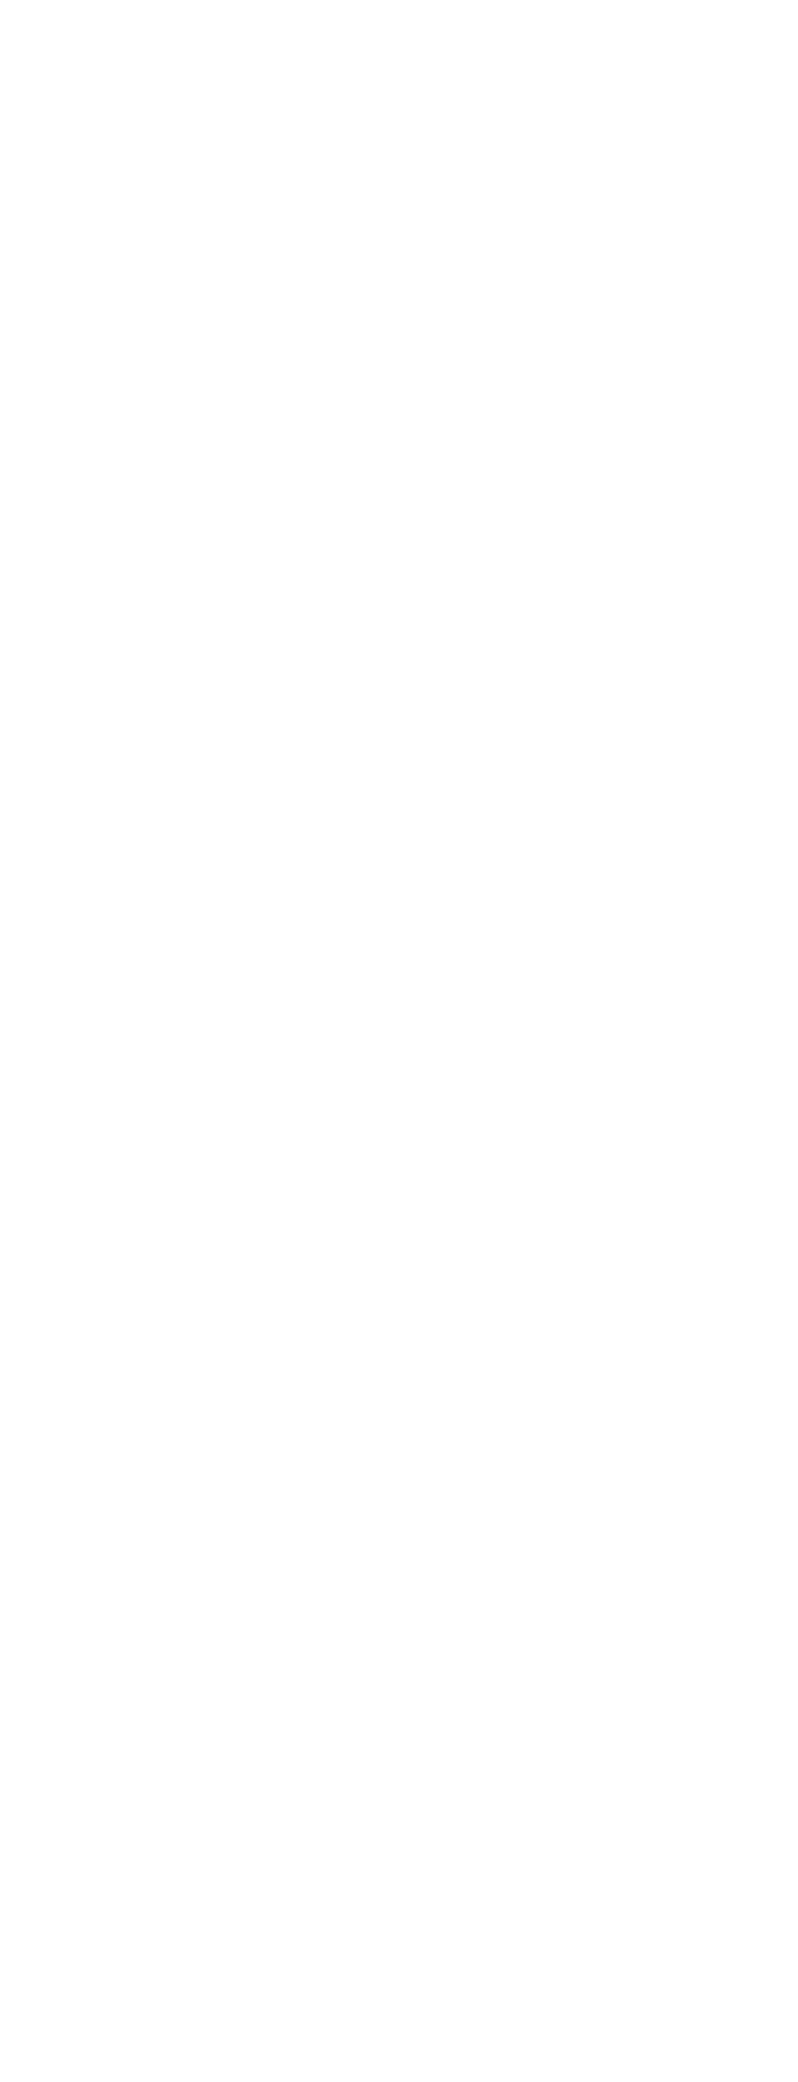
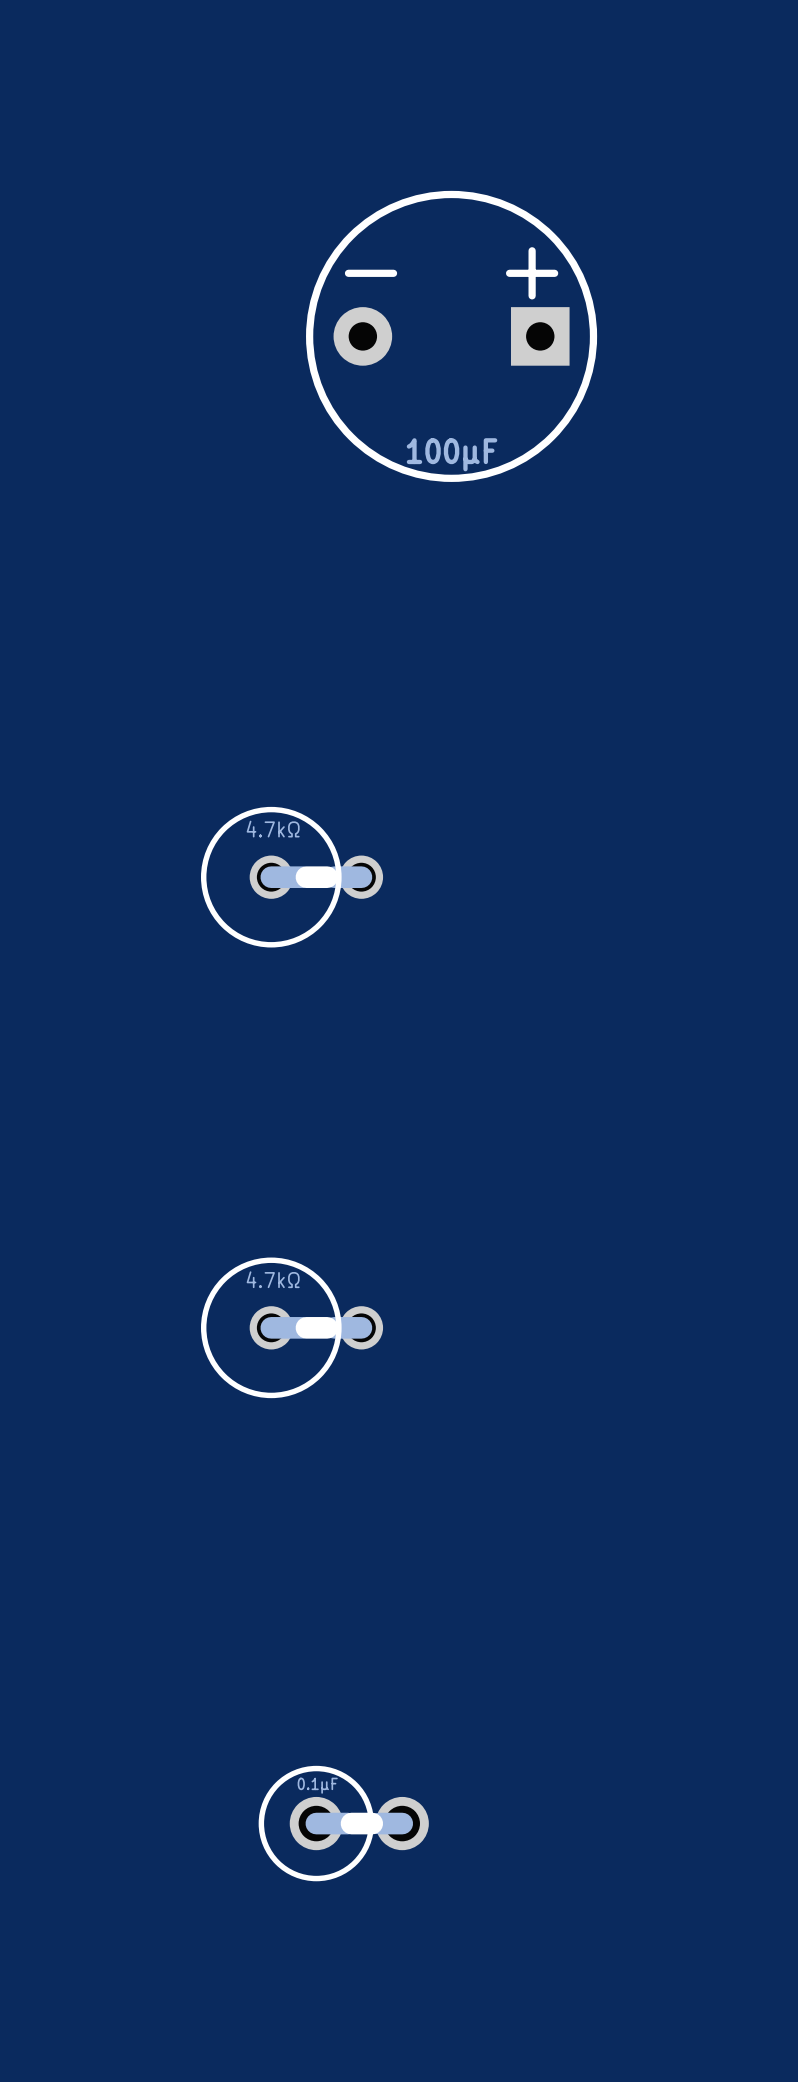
part: none -> (451, 336)
part: none -> (292, 877)
part: none -> (292, 1327)
part: none -> (343, 1823)

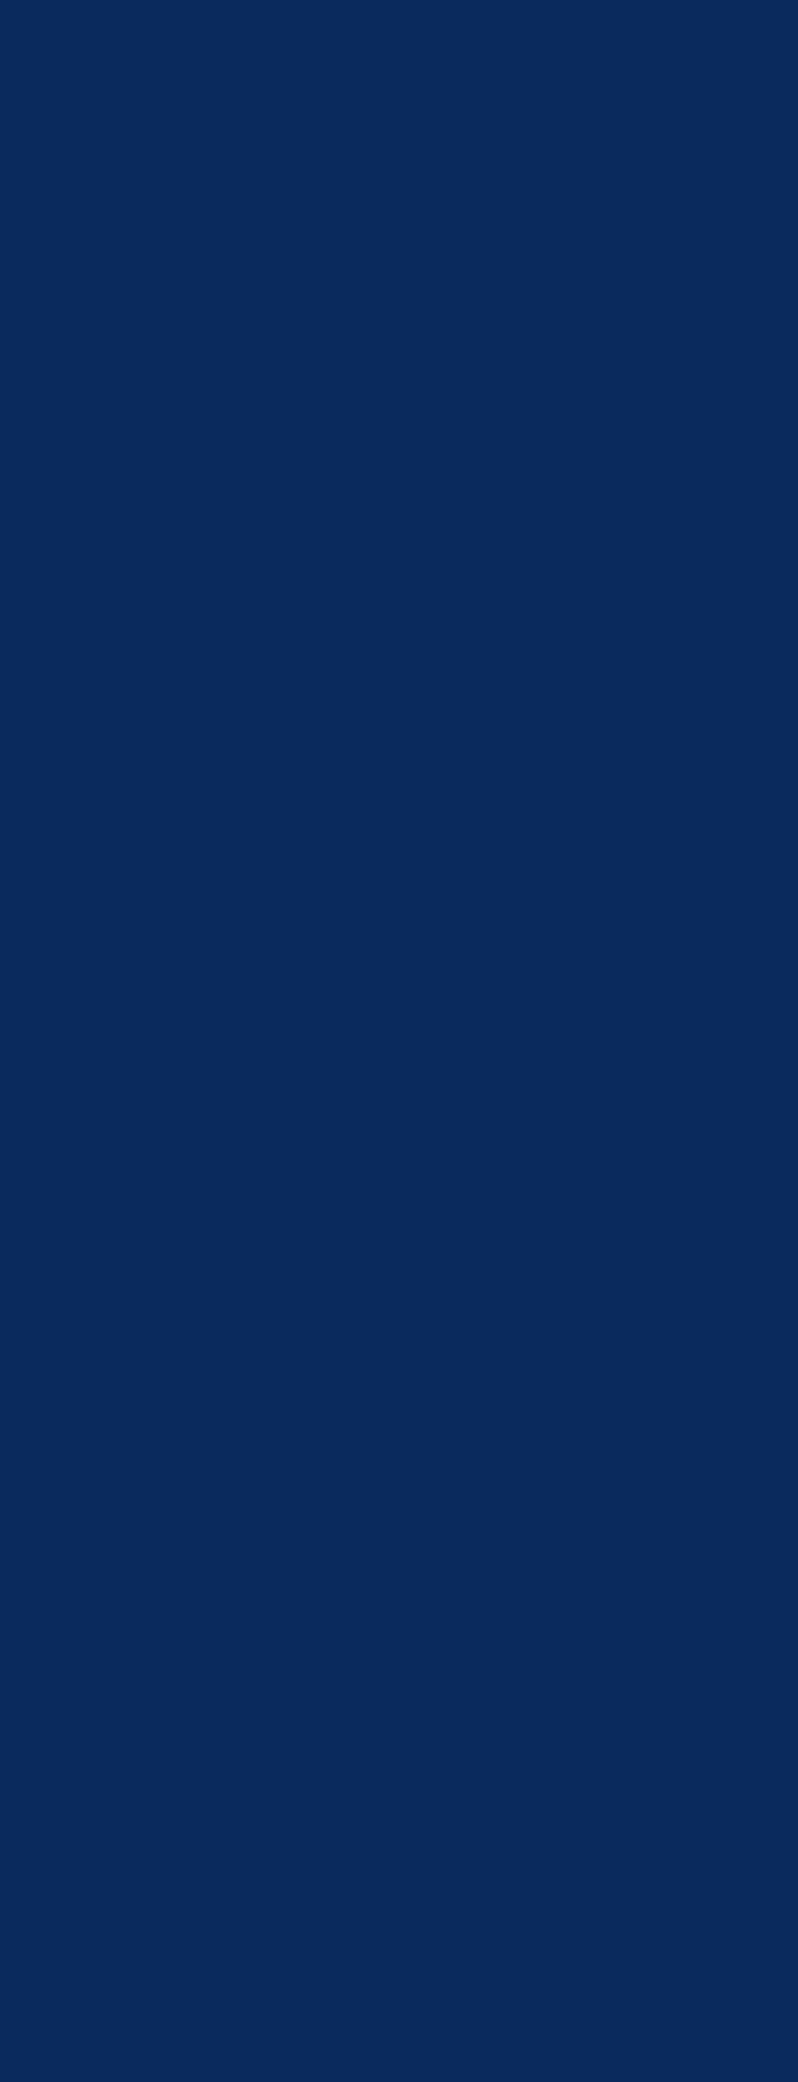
part: (451, 336) -> none
part: (292, 877) -> none
part: (292, 1327) -> none
part: (343, 1823) -> none

